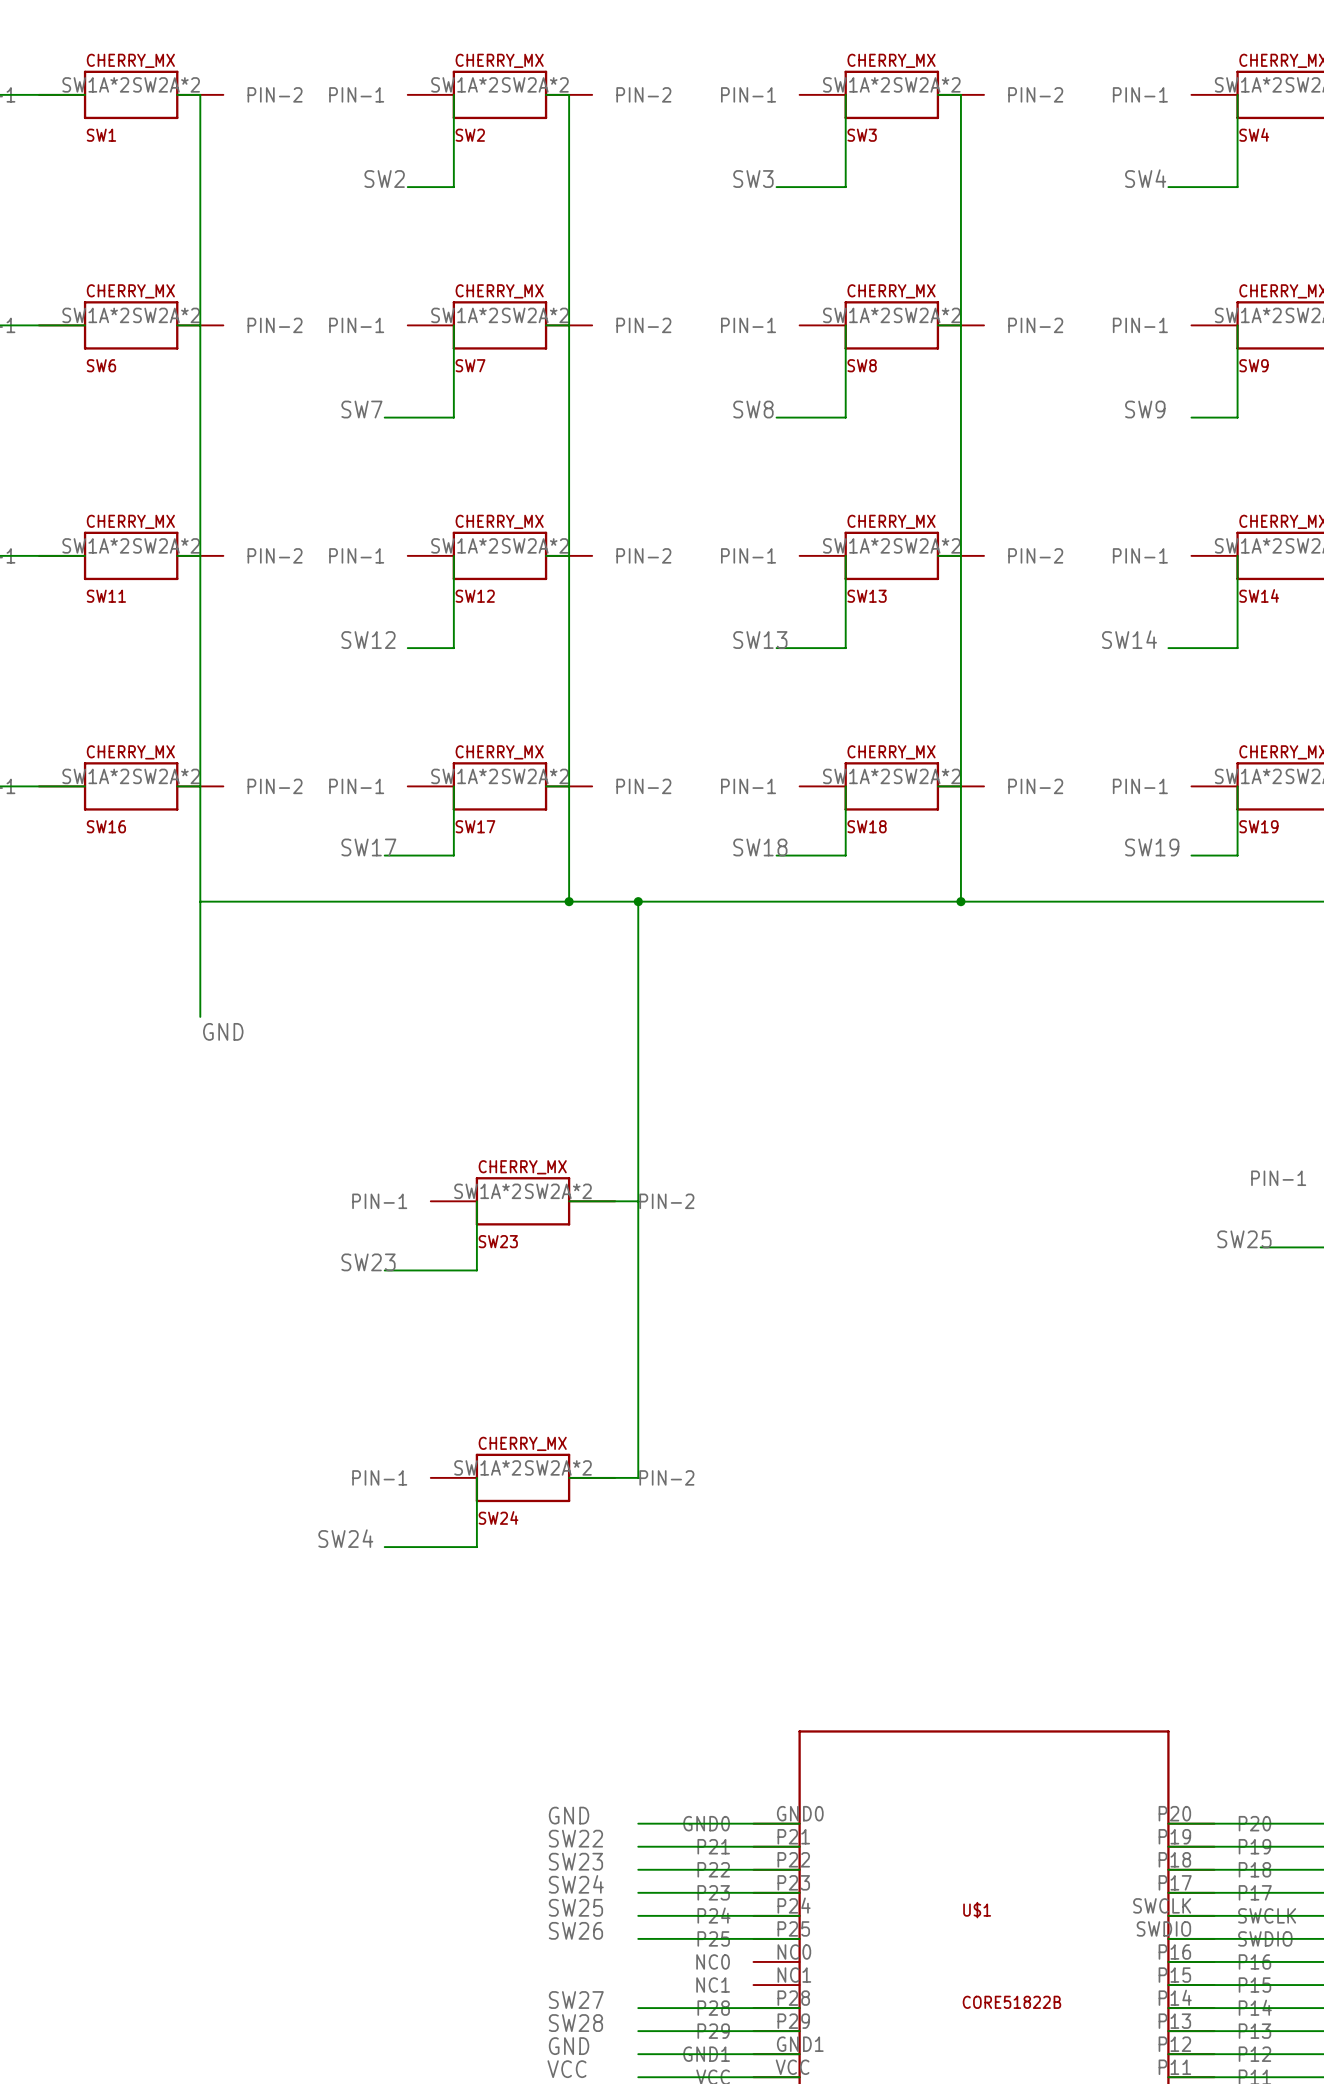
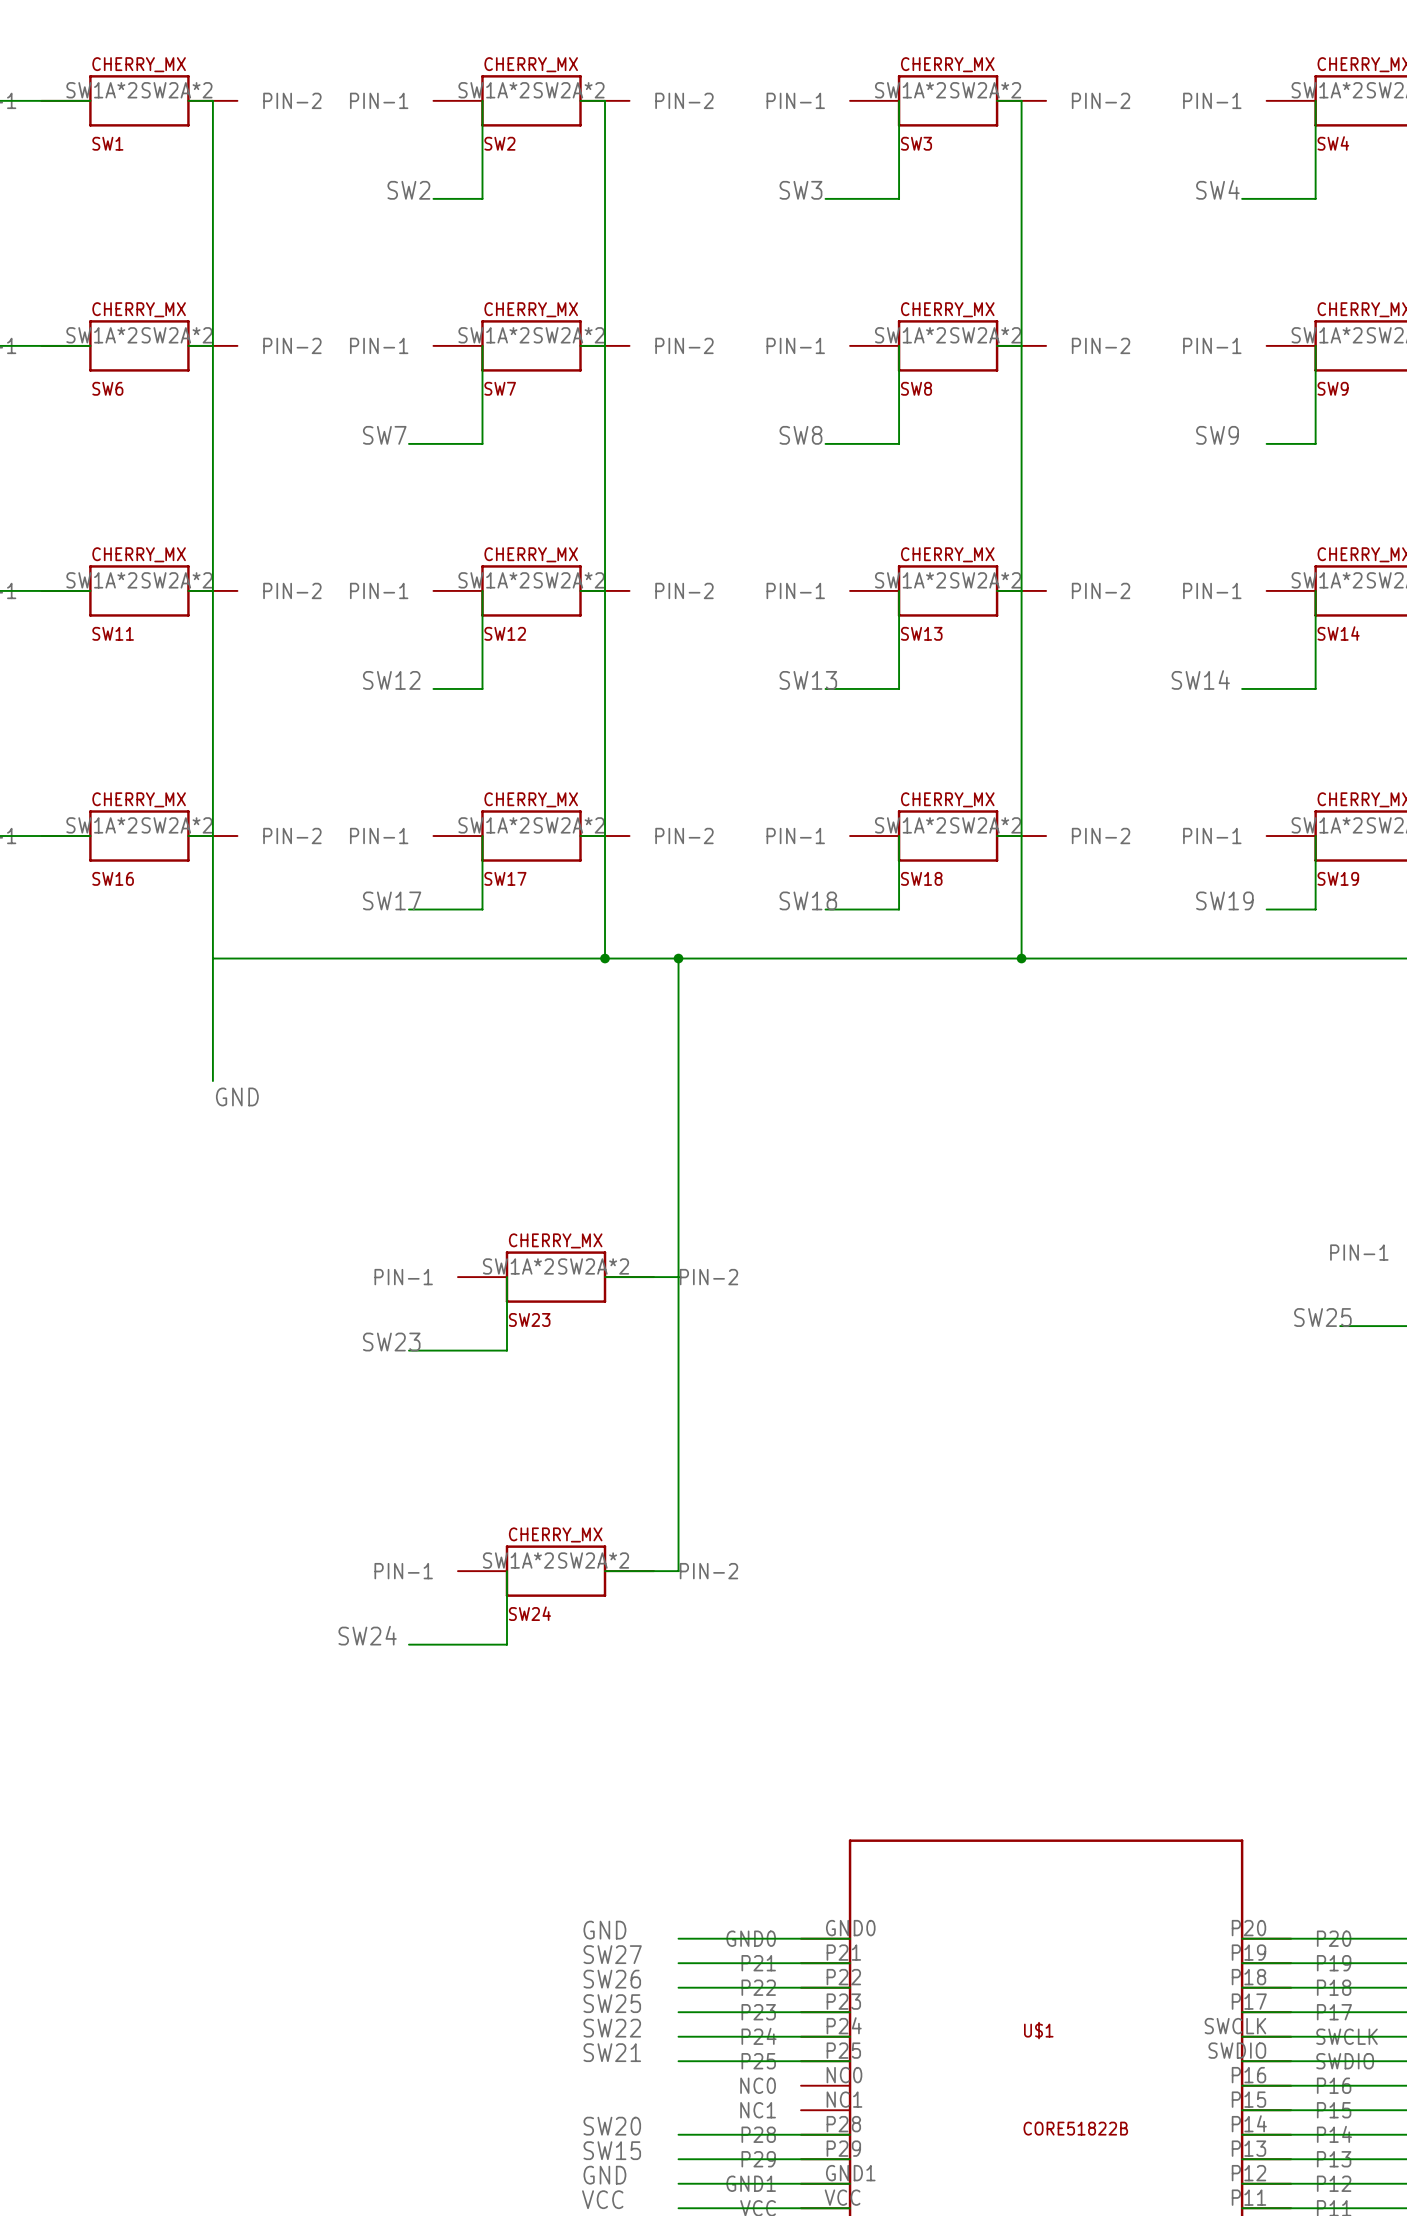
label: SW22 (575, 1838) -> SW27 (612, 1954)
label: SW23 (575, 1861) -> SW26 (612, 1979)
label: SW24 (576, 1884) -> SW25 (612, 2003)
label: SW25 (575, 1907) -> SW22 (612, 2028)
label: SW26 (575, 1930) -> SW21 (612, 2052)
label: SW27 (576, 2000) -> SW20 (612, 2126)
label: SW28 (575, 2023) -> SW15 (612, 2150)

